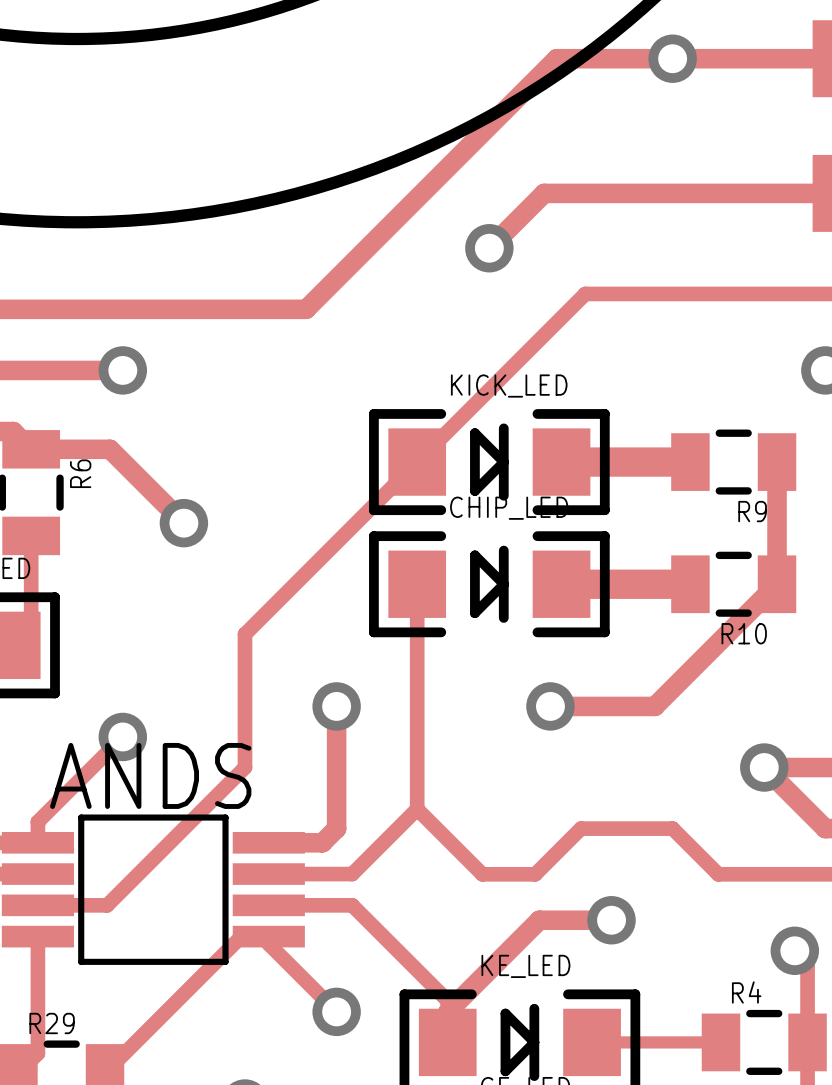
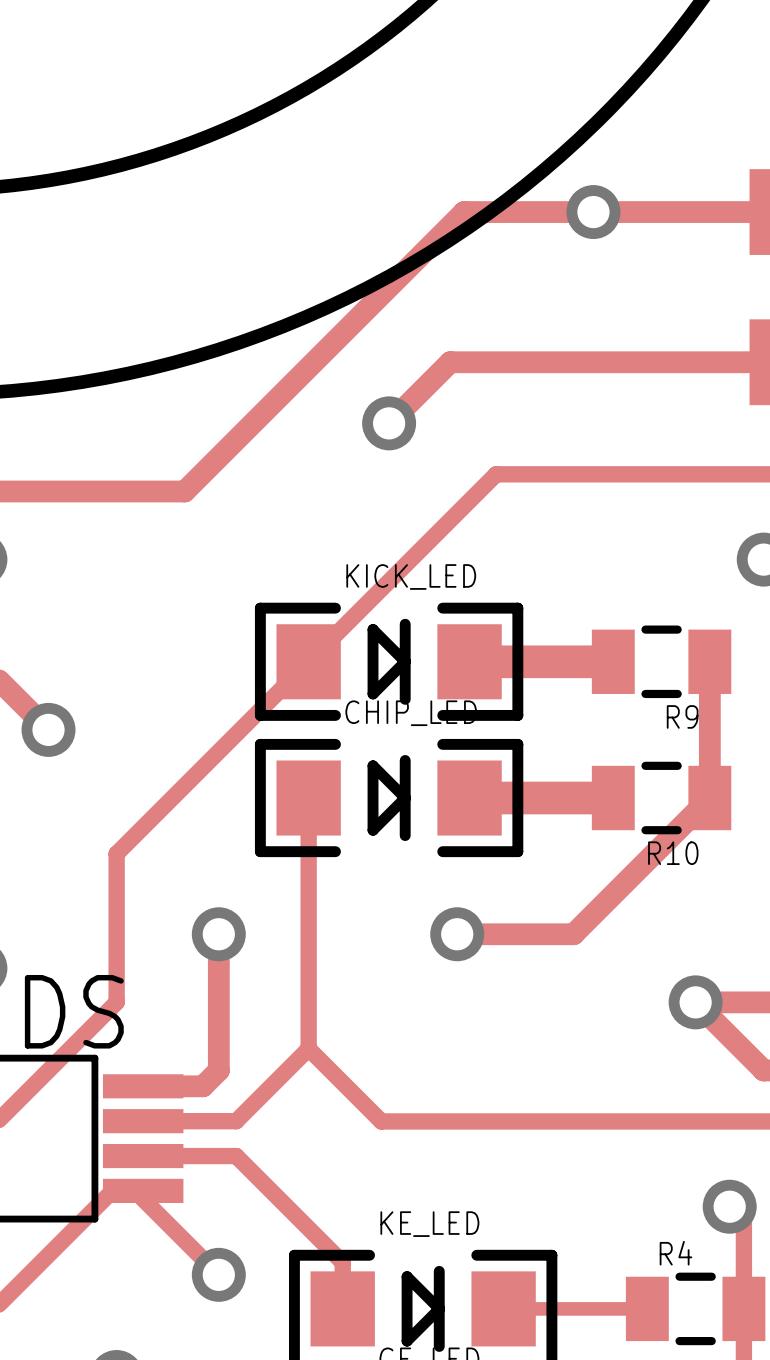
track: (535, 874) (580, 828) (672, 828) (718, 874) -> (440, 1121) (644, 1121)
track: (611, 920) (539, 920) (447, 1011) -> none
via: (611, 920) -> none

